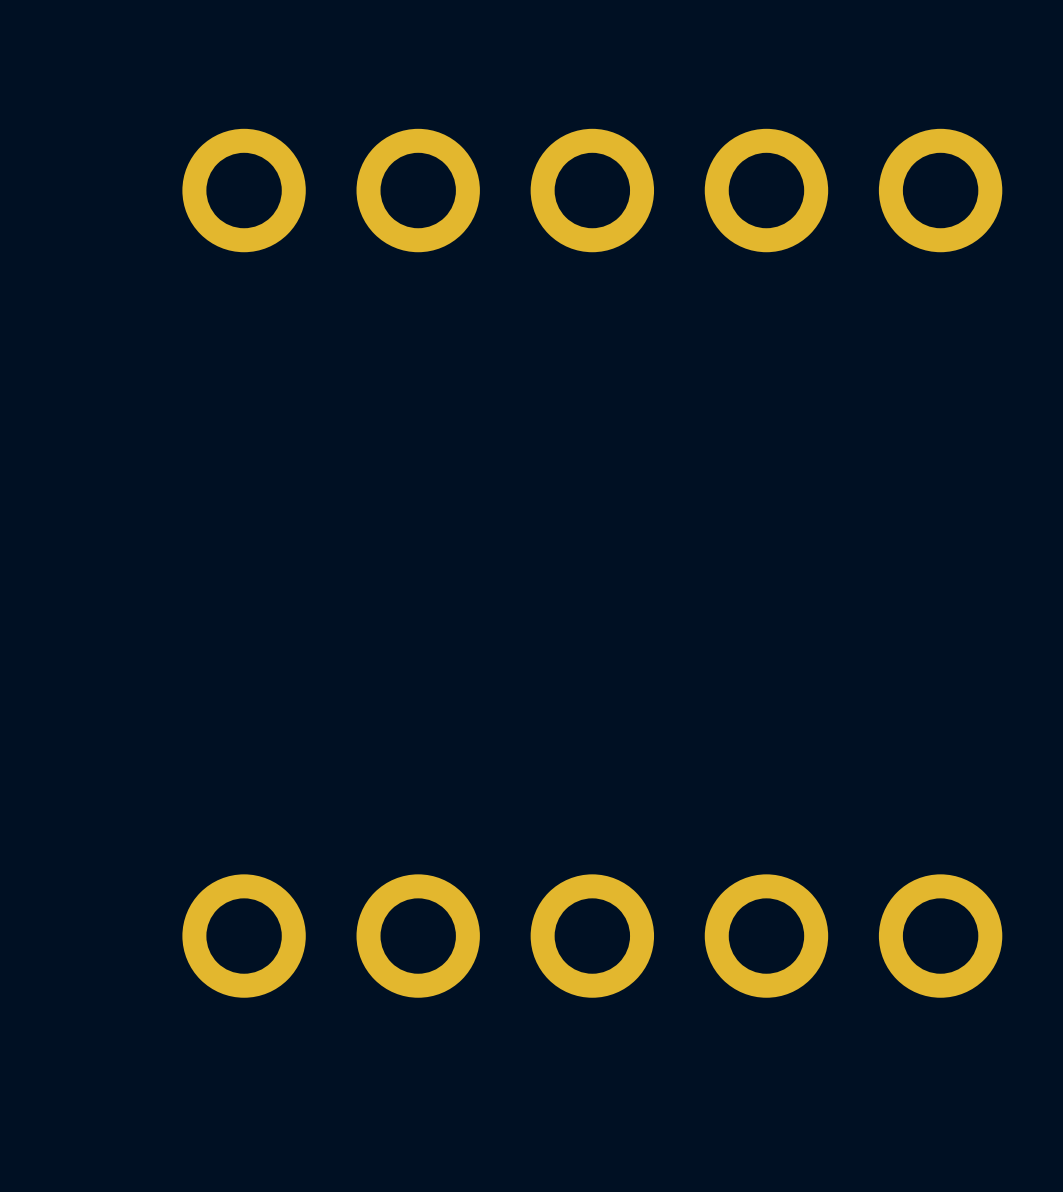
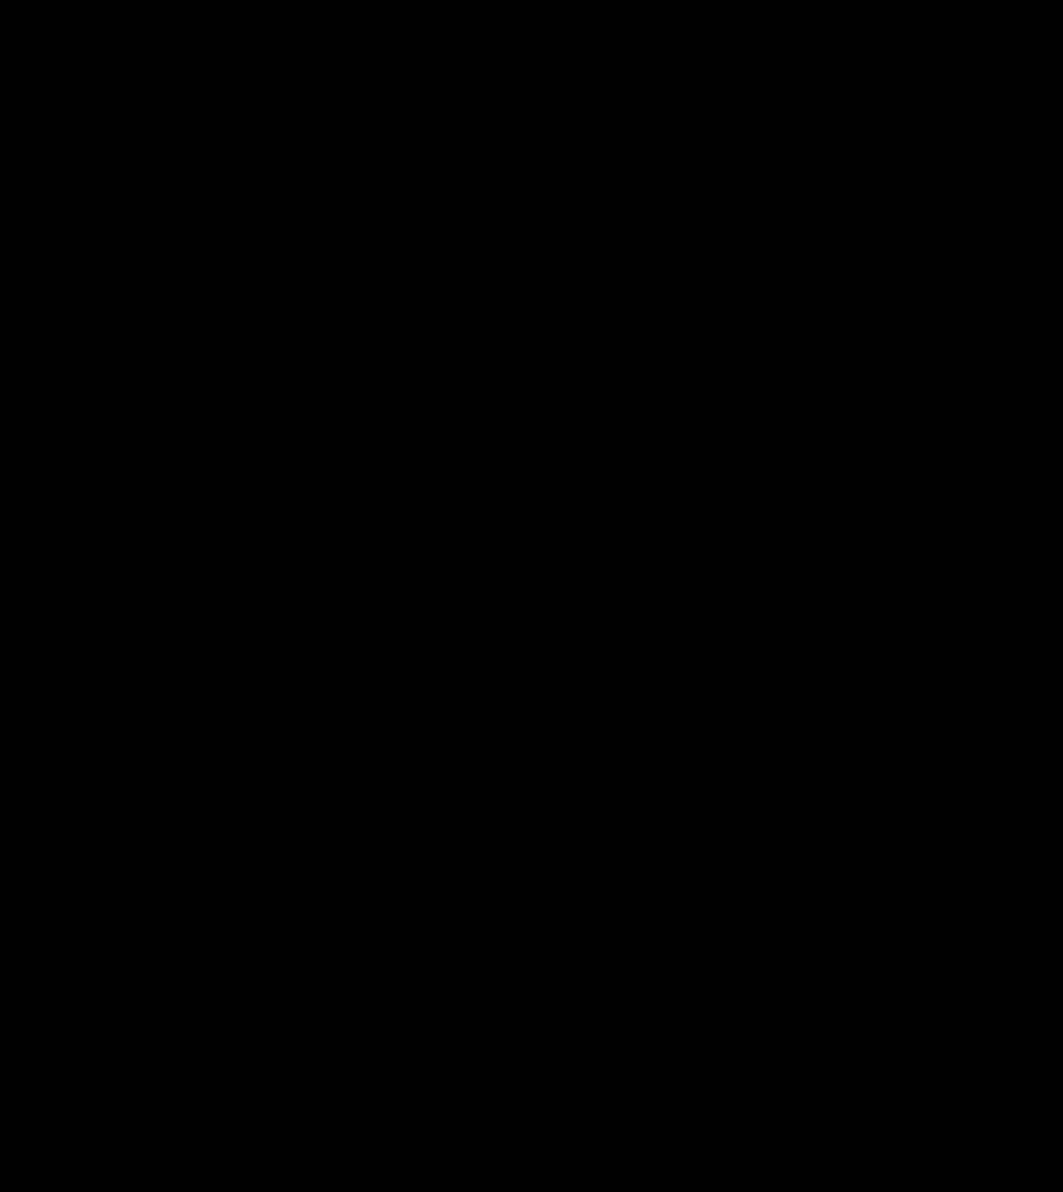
part: (592, 190) -> none
part: (592, 936) -> none

